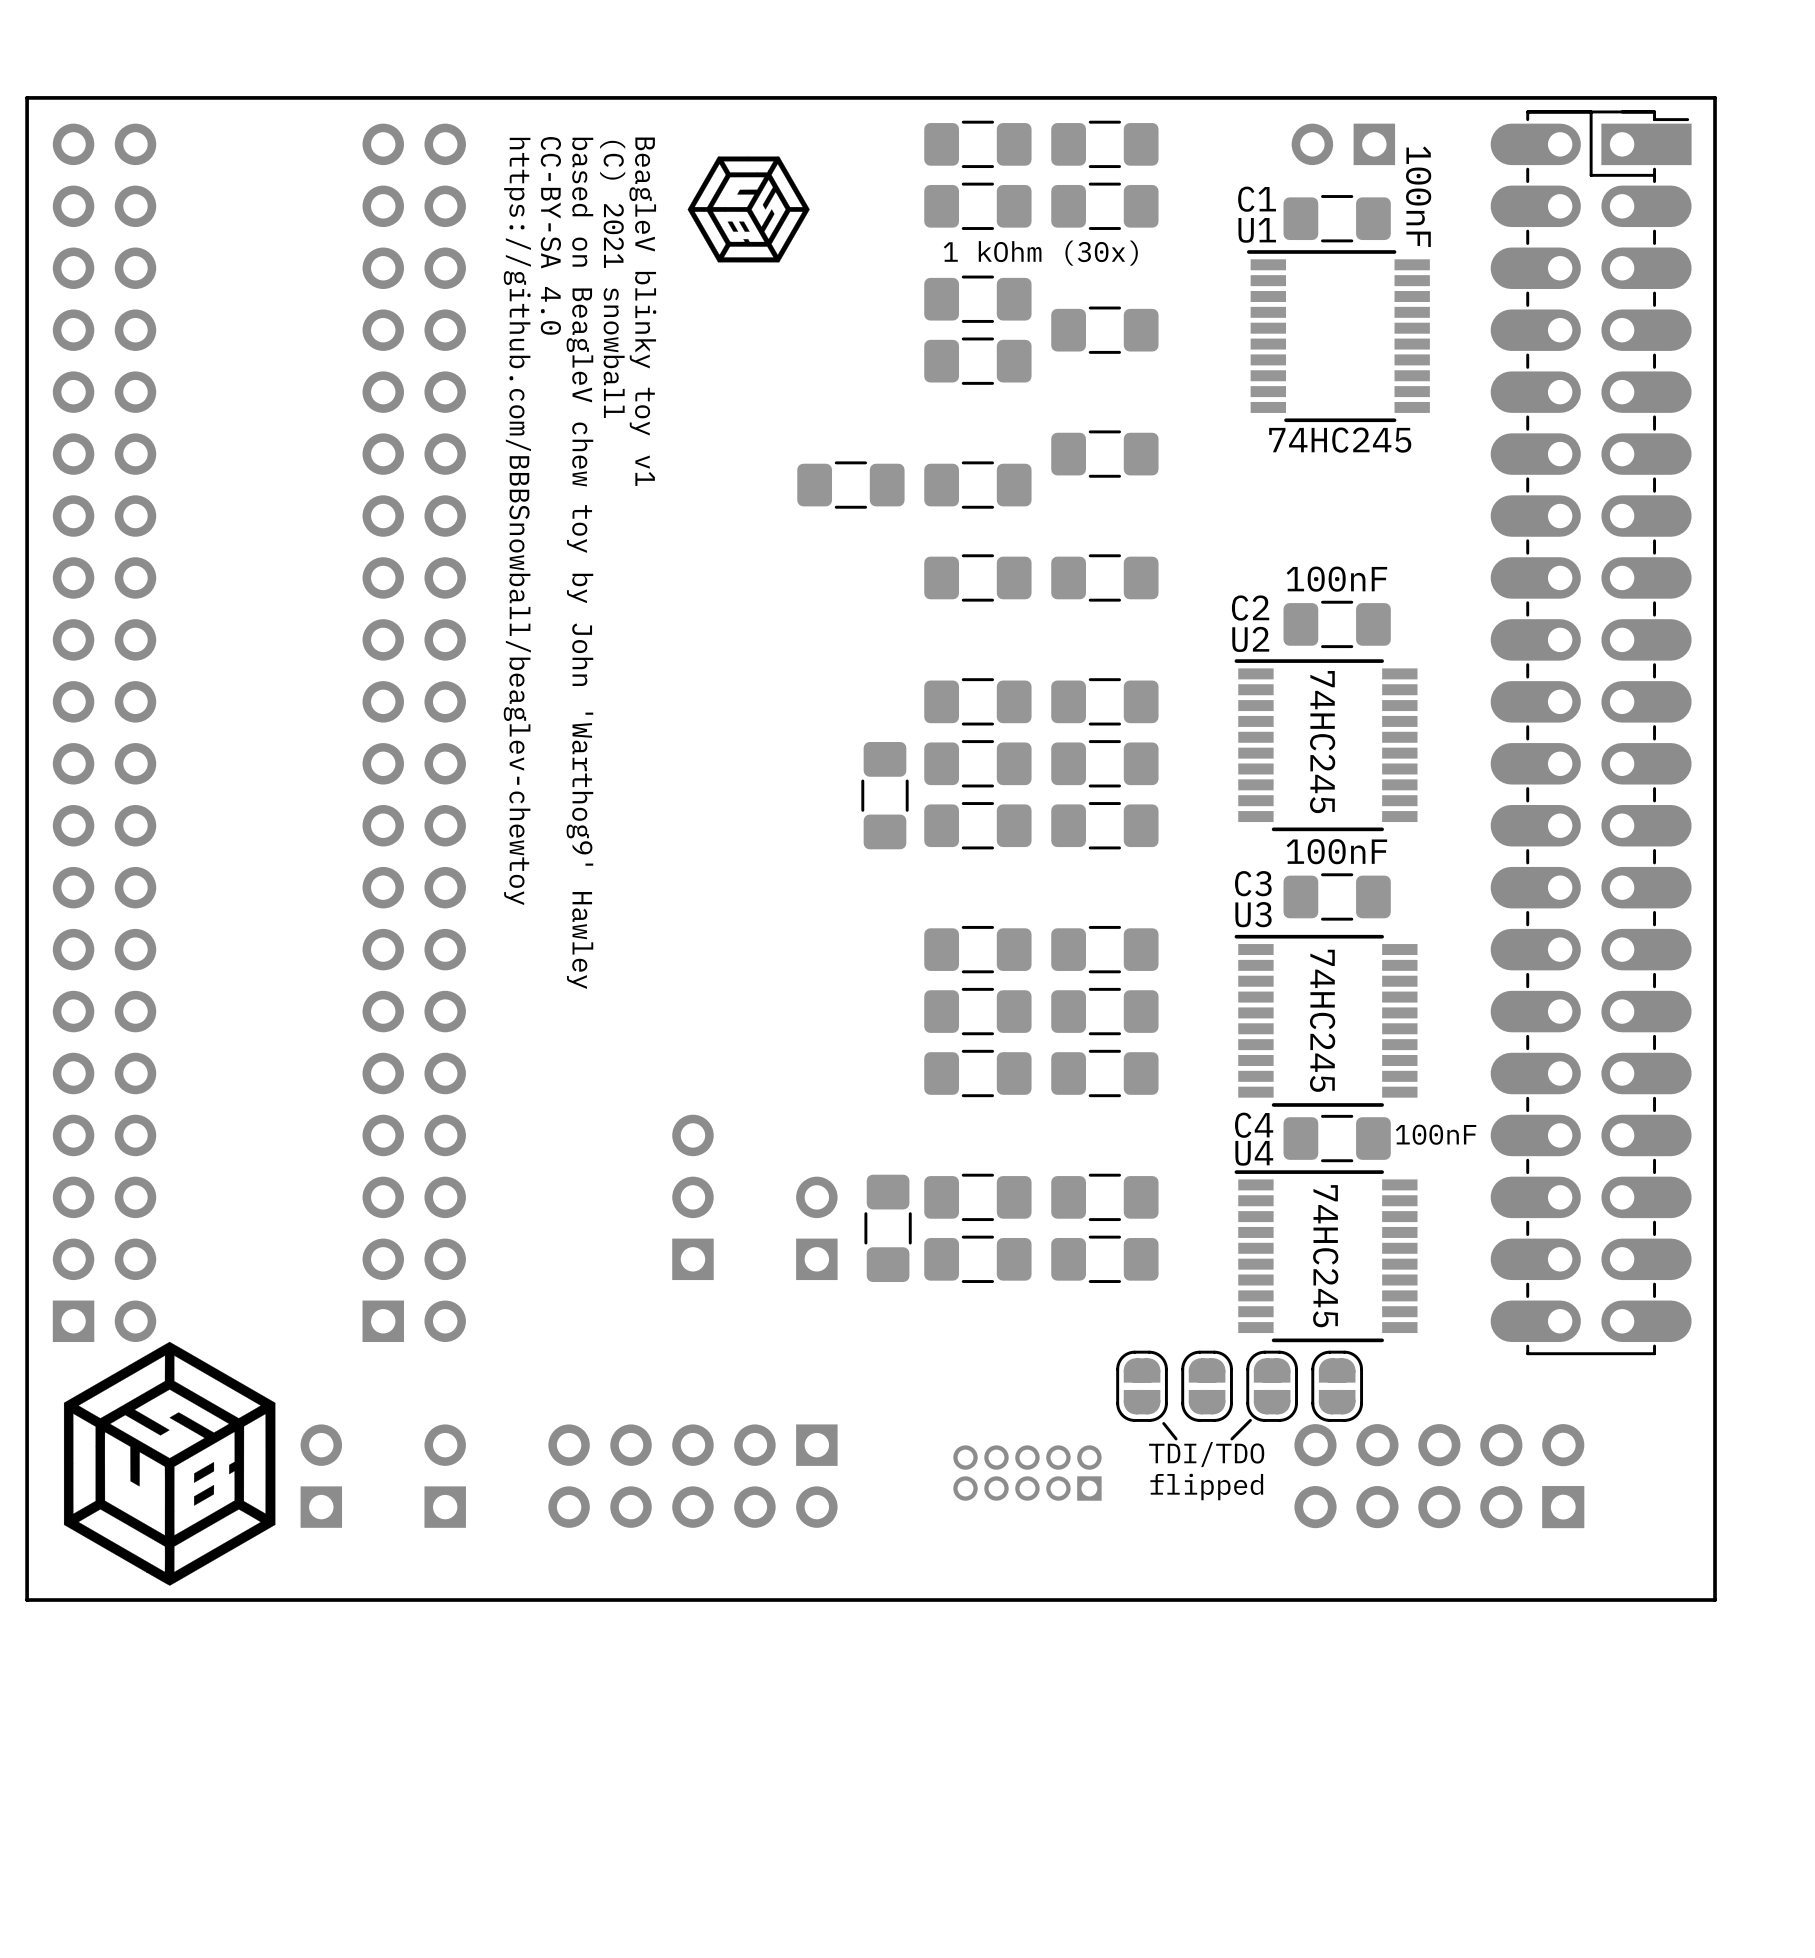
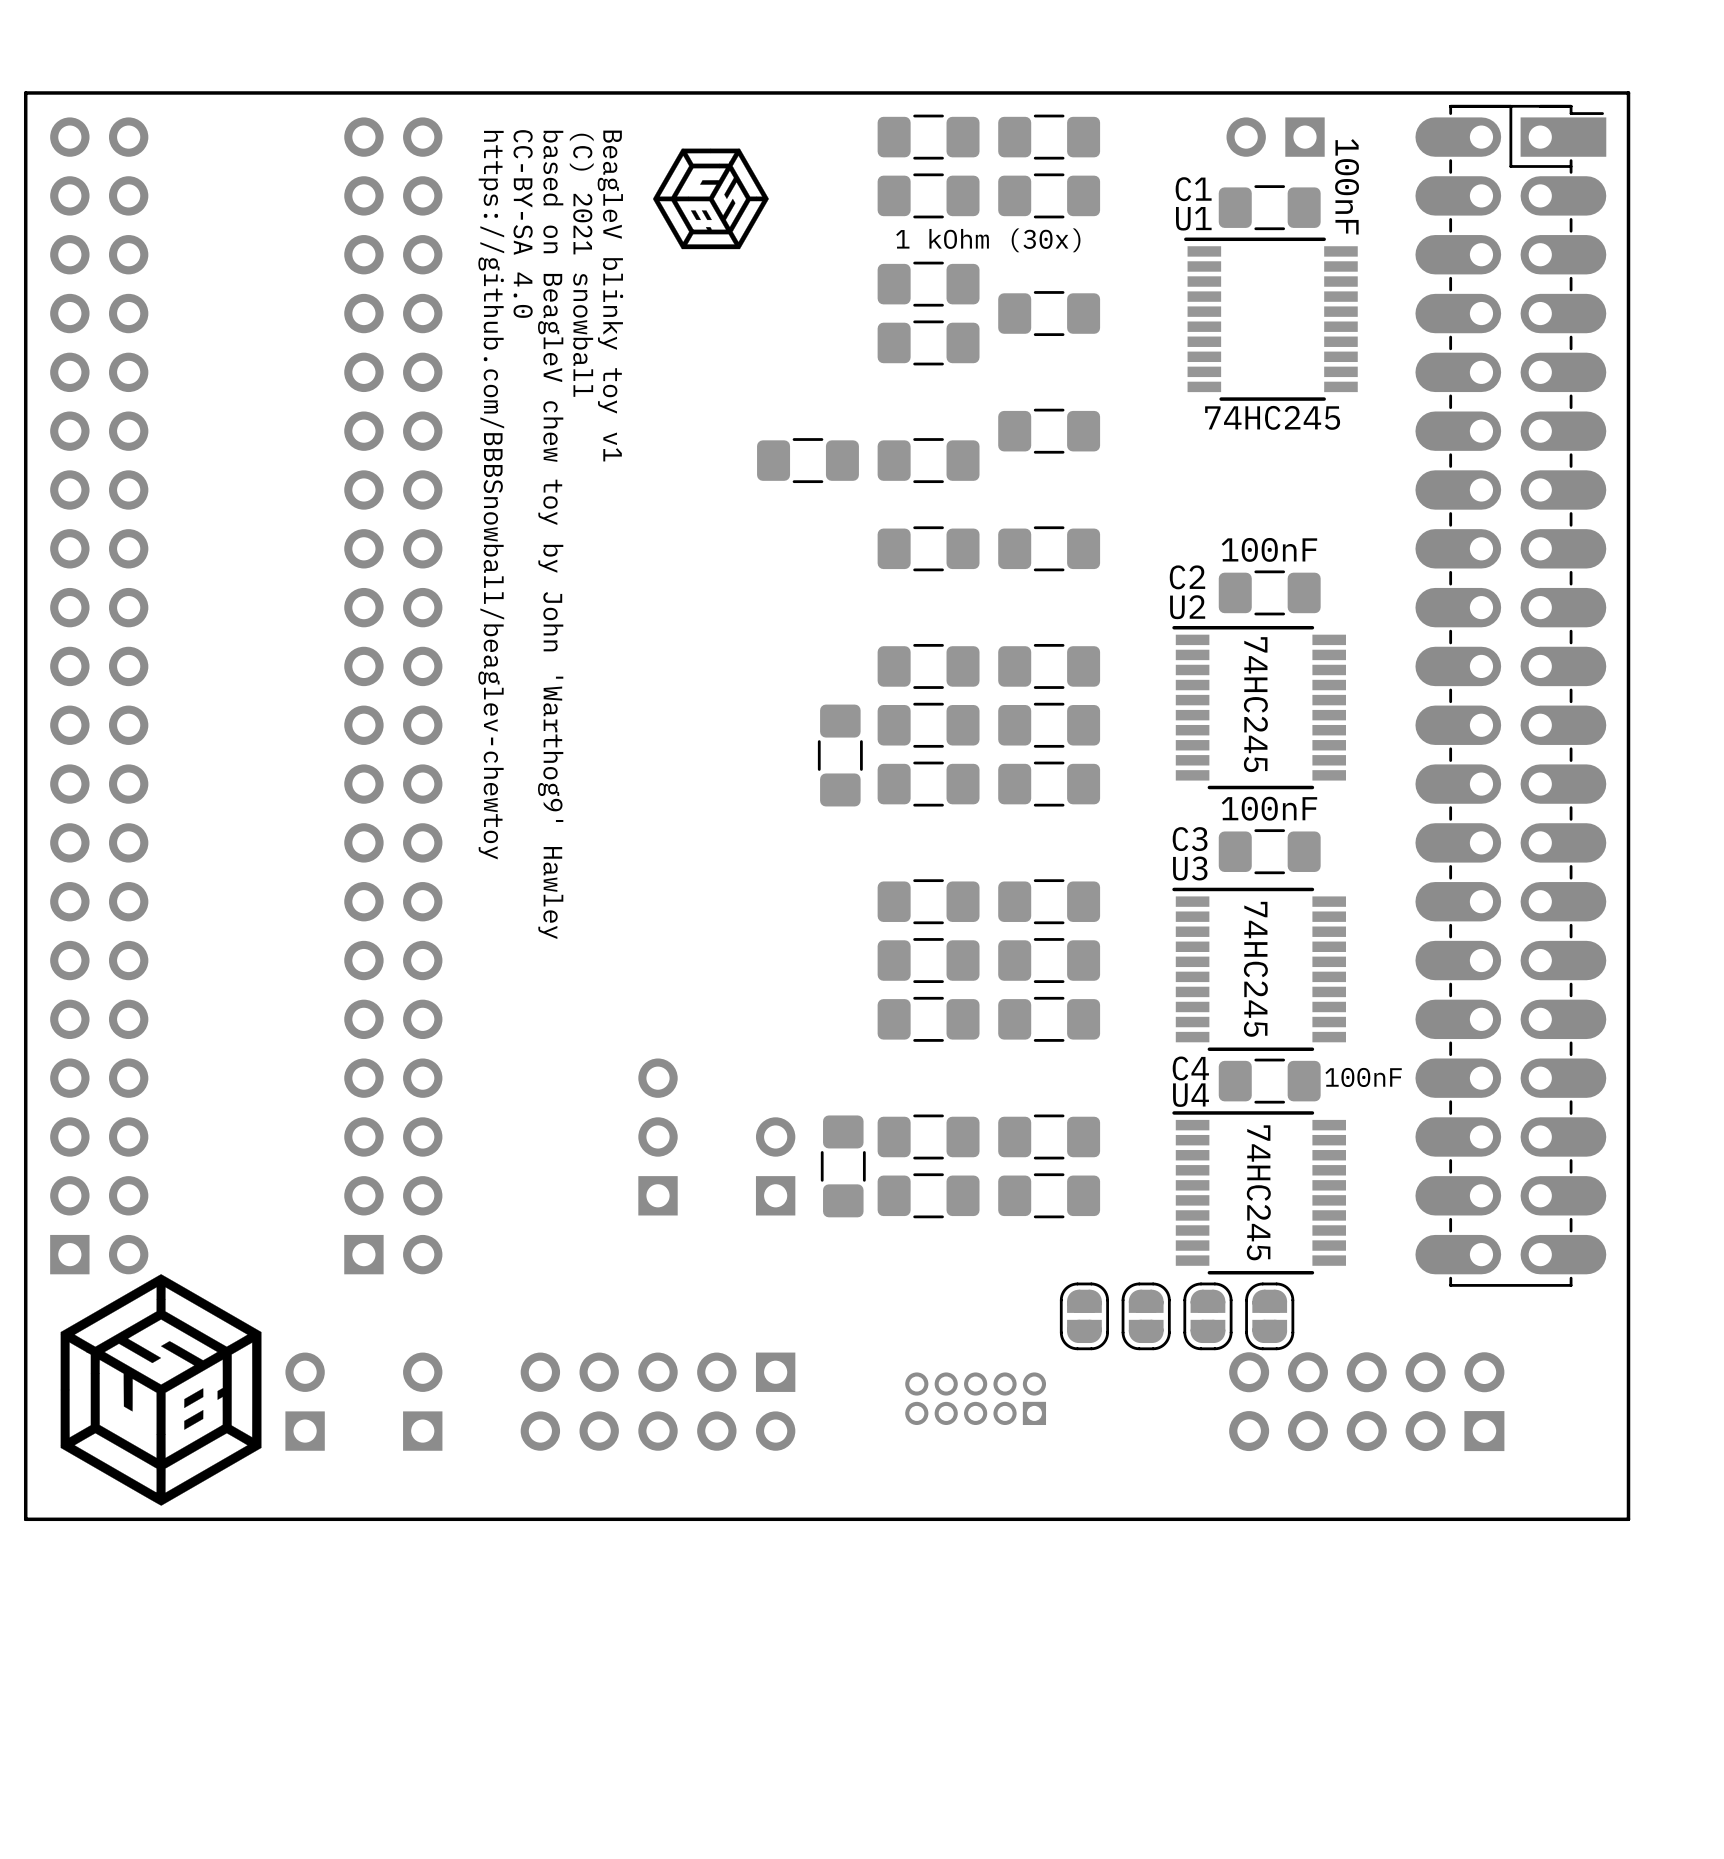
line: (1250, 1420) (1231, 1438) -> none
line: (1163, 1423) (1176, 1438) -> none
text: TDI/TDO (1206, 1454) -> none
text: flipped (1206, 1487) -> none

